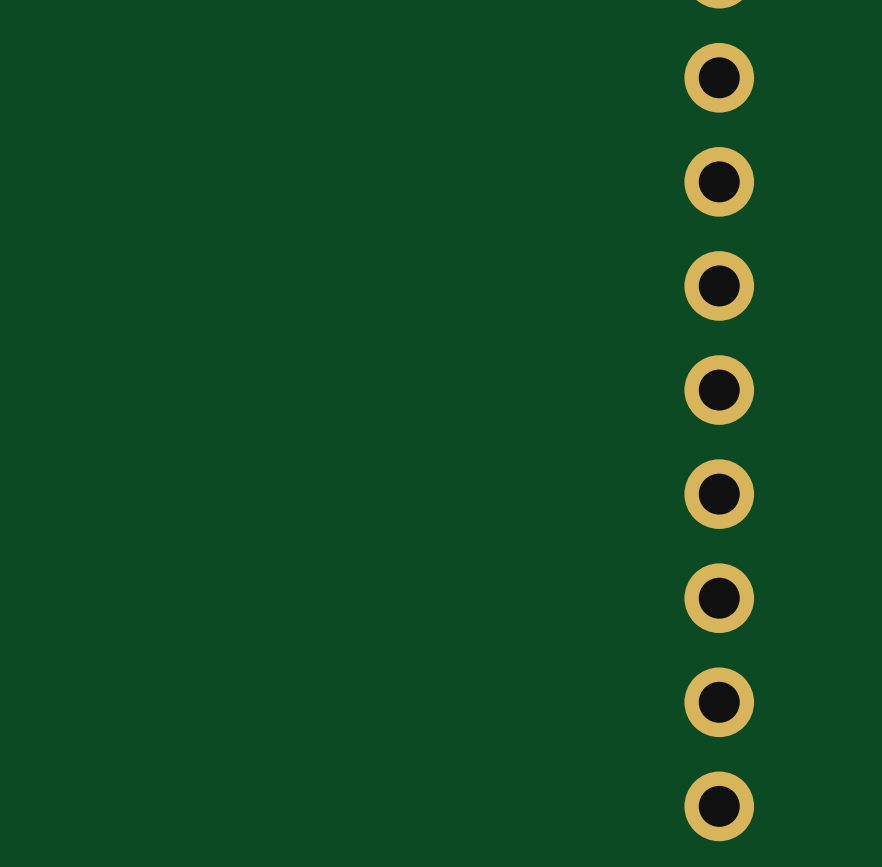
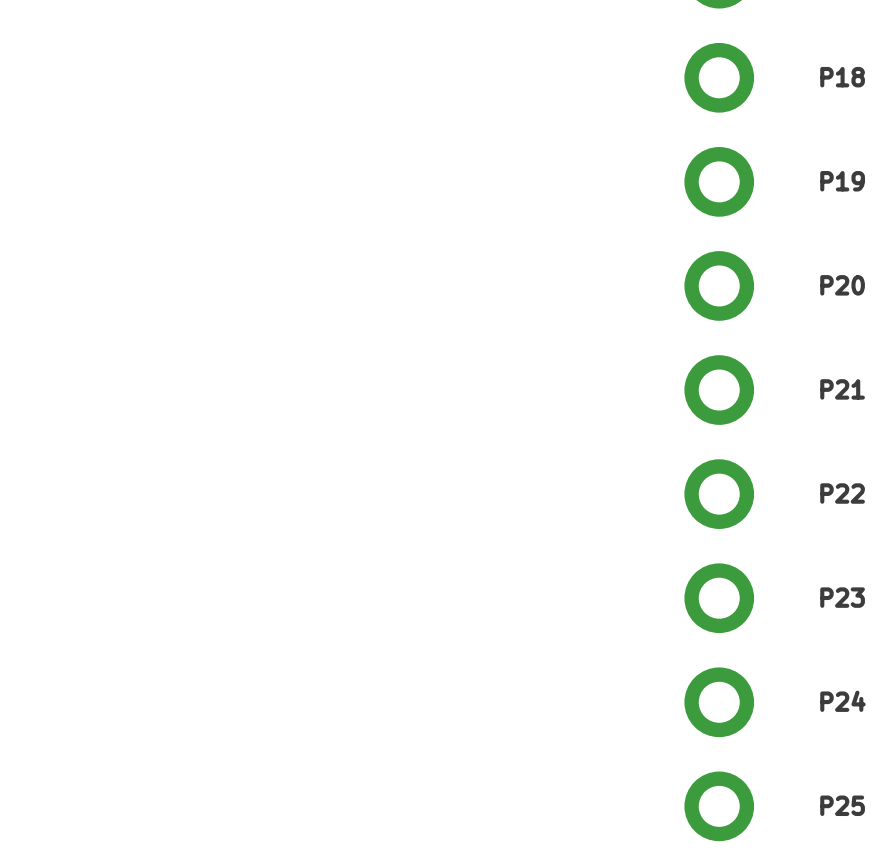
text: none -> P18 (842, 77)
text: none -> P19 (842, 181)
text: none -> P20 (842, 285)
text: none -> P21 (842, 389)
text: none -> P22 (842, 493)
text: none -> P23 (842, 597)
text: none -> P24 (842, 701)
text: none -> P25 (842, 805)

